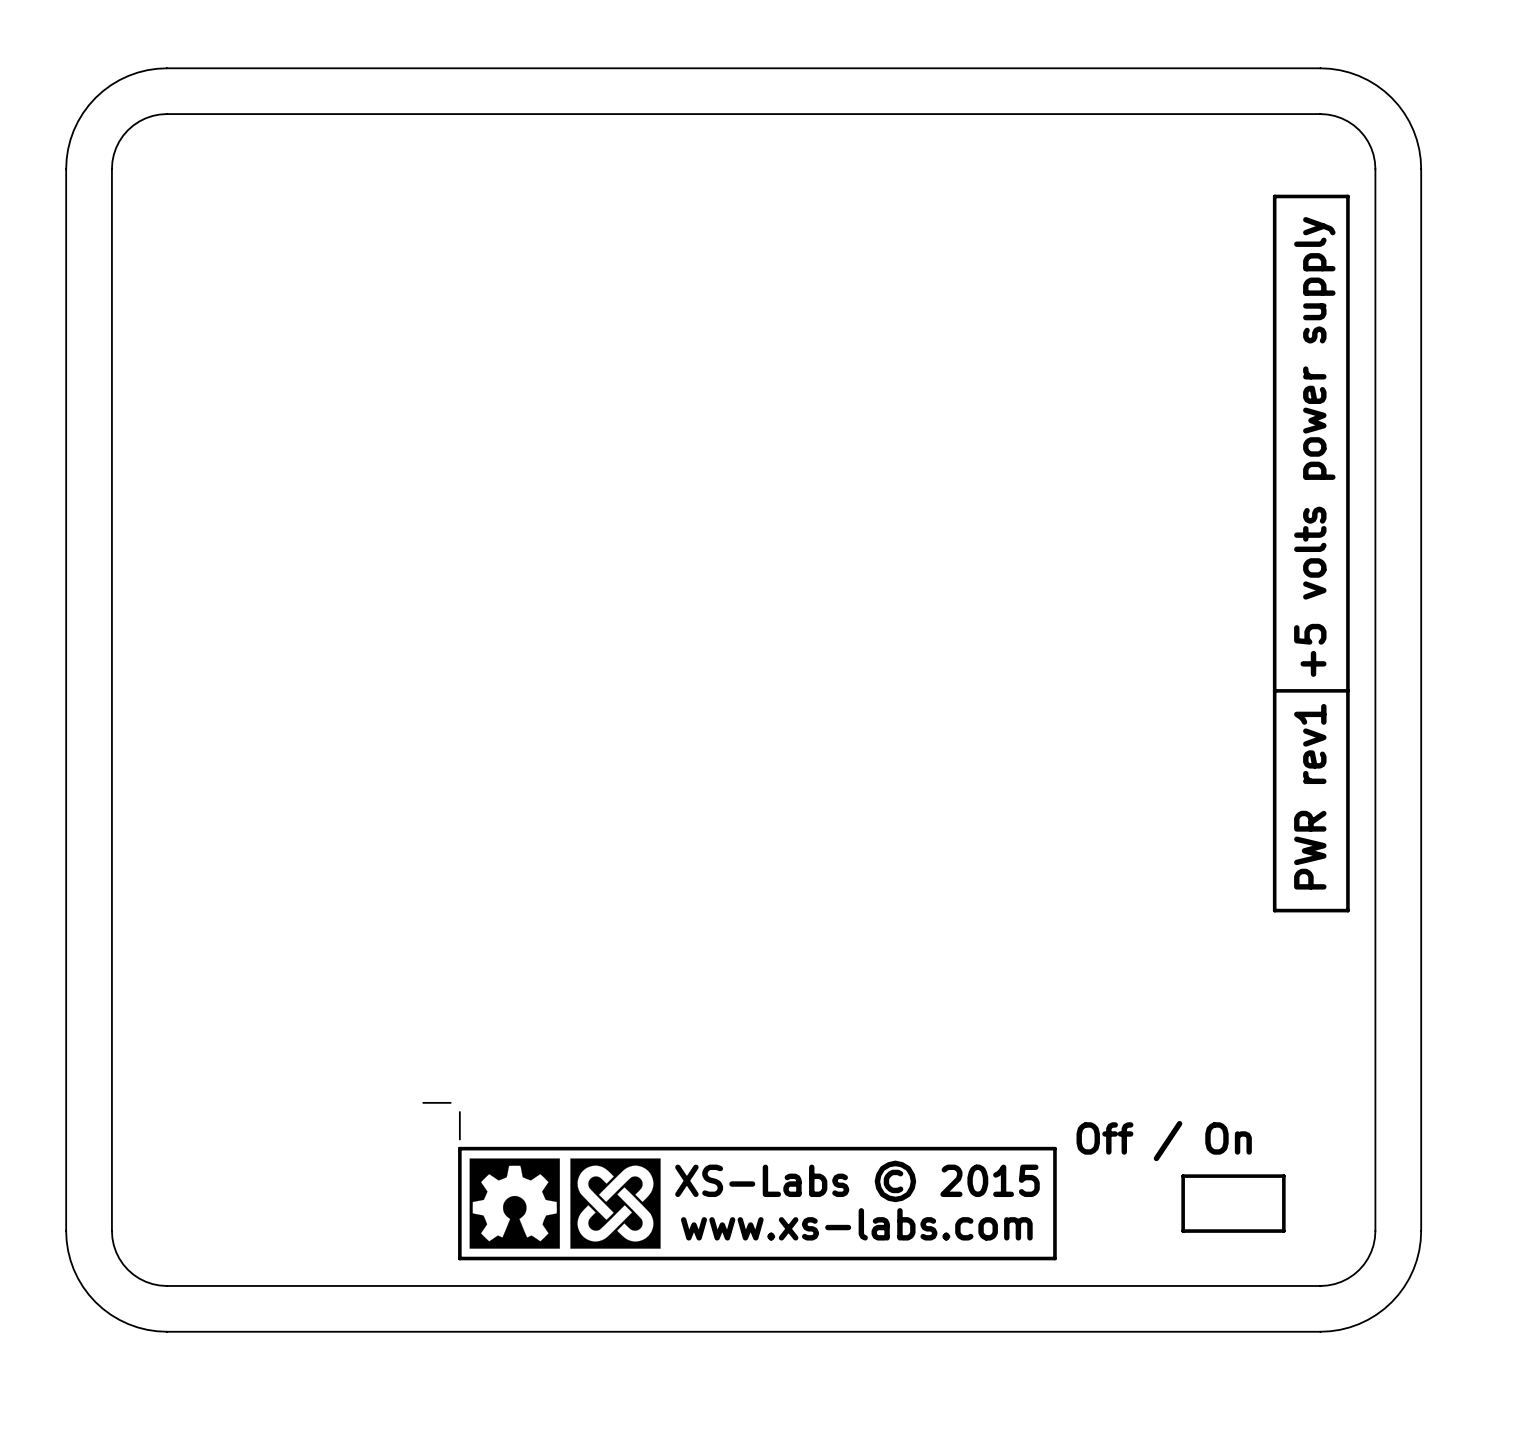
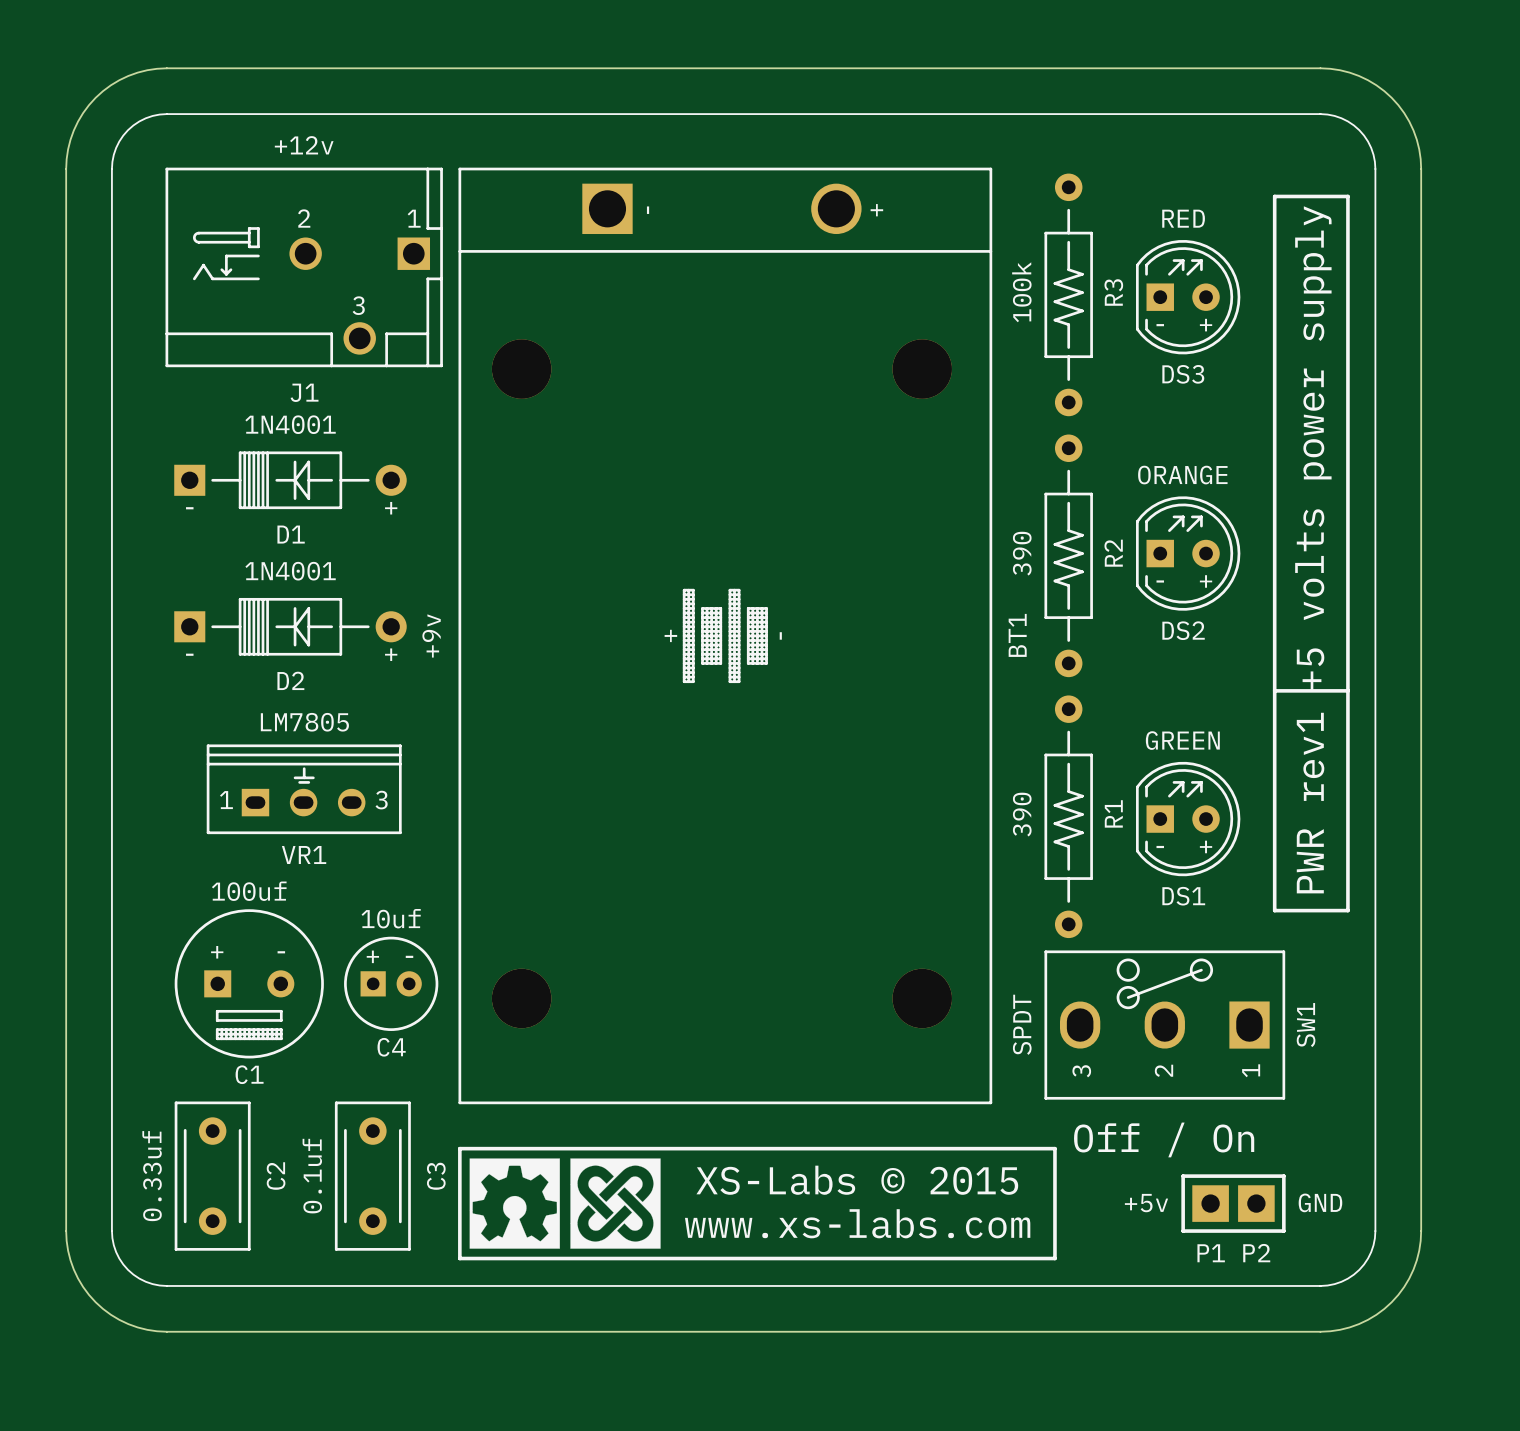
J1: none -> +12v (304, 267)
R3: none -> 100k (1068, 294)
DS3: none -> RED (1188, 297)
D1: none -> 1N4001 (290, 480)
DS2: none -> ORANGE (1188, 553)
R2: none -> 390 (1068, 555)
D2: none -> 1N4001 (290, 626)
BT1: none -> +9v (725, 635)
VR1: none -> LM7805 (304, 789)
R1: none -> 390 (1068, 816)
DS1: none -> GREEN (1188, 819)
C1: none -> 100uf (249, 983)
C4: none -> 10uf (391, 983)
SW1: none -> SPDT (1164, 1025)
line: (423, 1102) (450, 1102) -> none
line: (459, 1112) (459, 1139) -> none
C2: none -> 0.33uf (212, 1176)
C3: none -> 0.1uf (372, 1176)
P1: none -> +5v (1210, 1203)
P2: none -> GND (1256, 1203)

